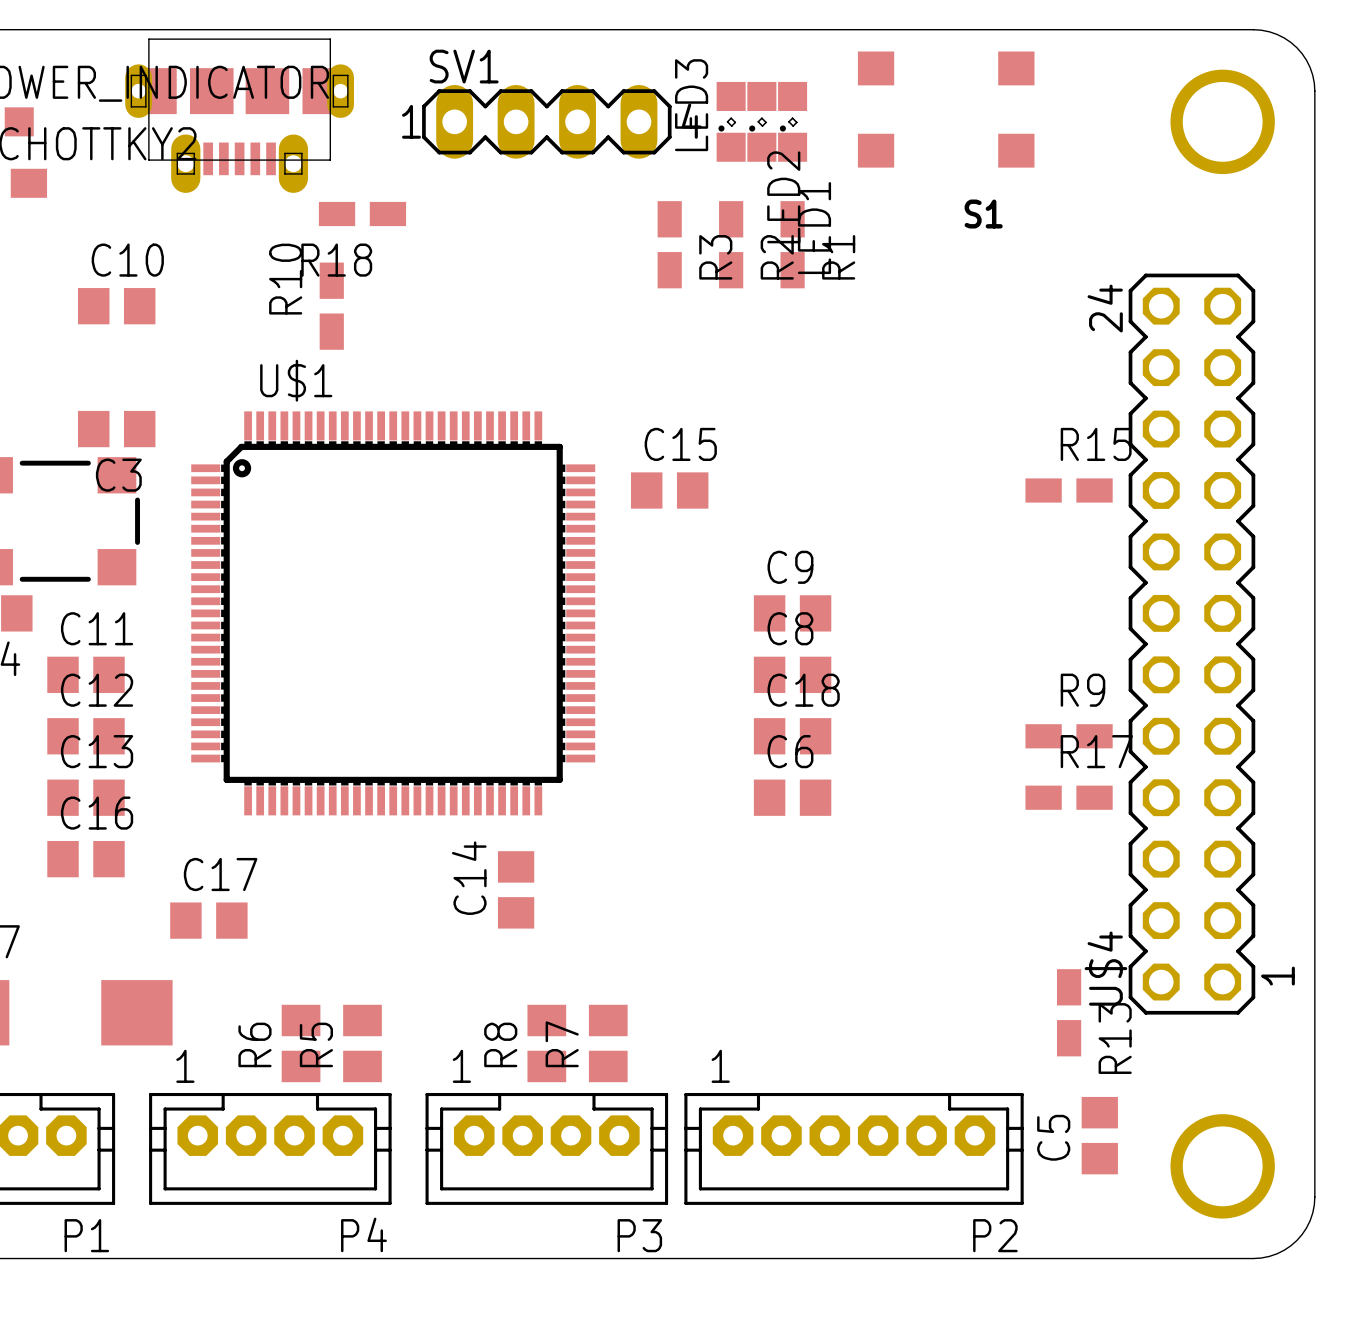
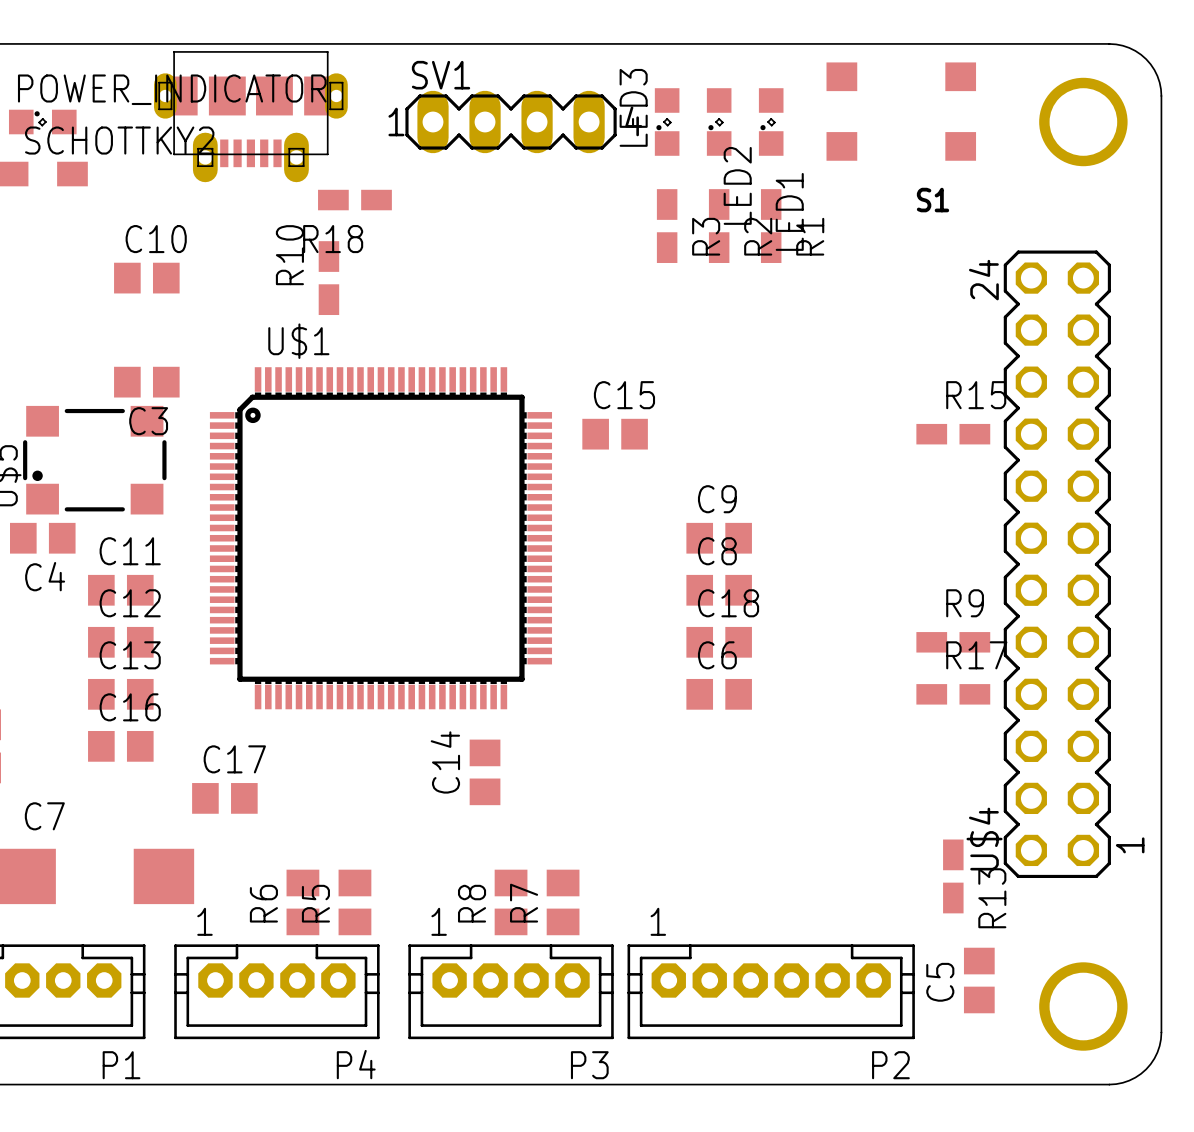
S1 position: (946, 109) -> (901, 111)
LED2: (761, 121) -> none
LED1: none -> (771, 122)
LED1 name: LED1 (814, 228) -> LED2 (737, 185)
R3: (669, 244) -> none
R1: none -> (771, 226)
R2 name: R2 (777, 257) -> R3 (706, 236)
R1 name: R1 (838, 257) -> R2 (758, 236)

